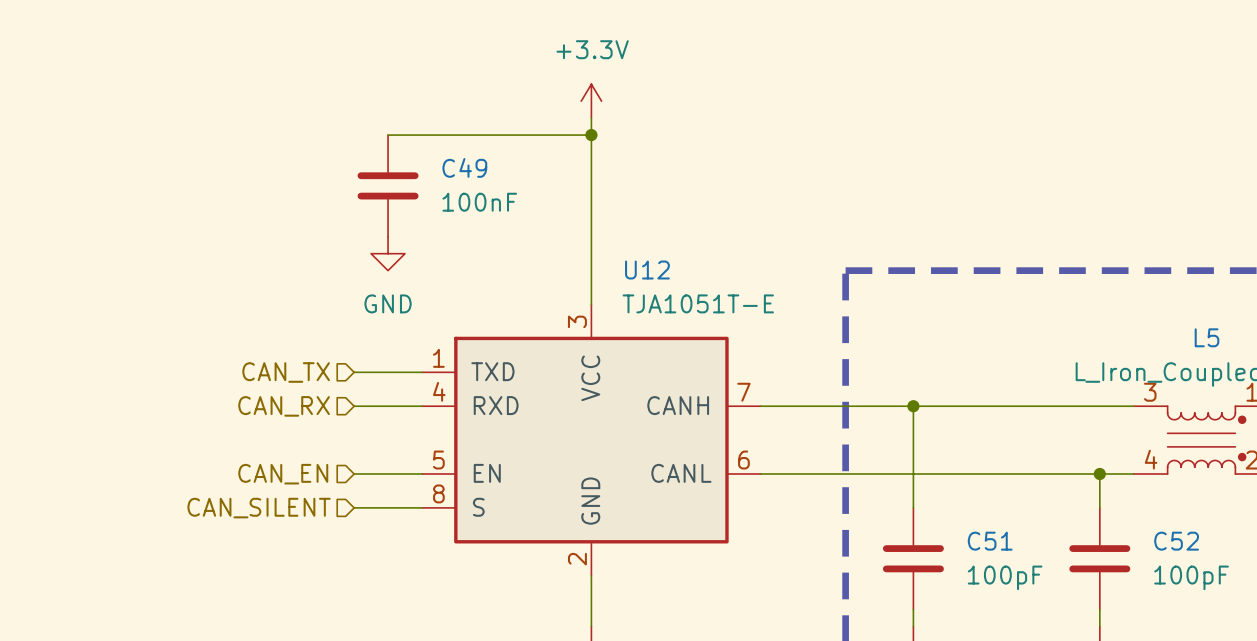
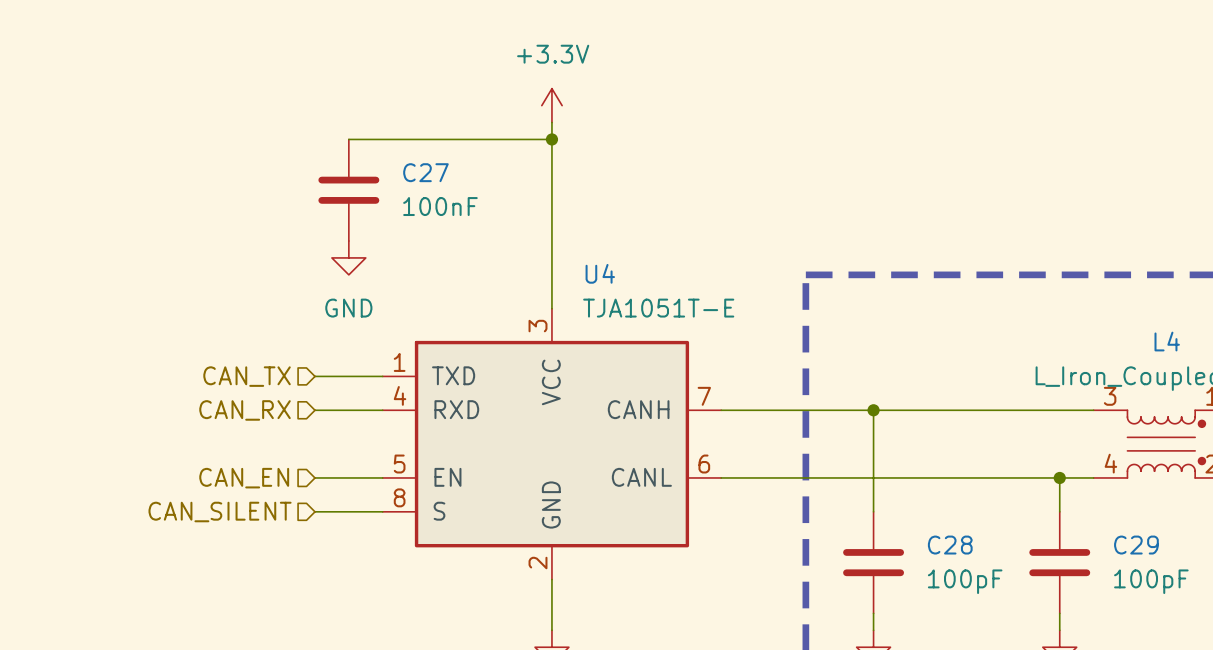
C49 name: C49 (464, 167) -> C27 (425, 172)
U12 name: U12 (647, 270) -> U4 (600, 273)
L5 name: L5 (1206, 337) -> L4 (1167, 341)
C51 name: C51 (990, 541) -> C28 (950, 545)
C52 name: C52 (1176, 541) -> C29 (1136, 545)

